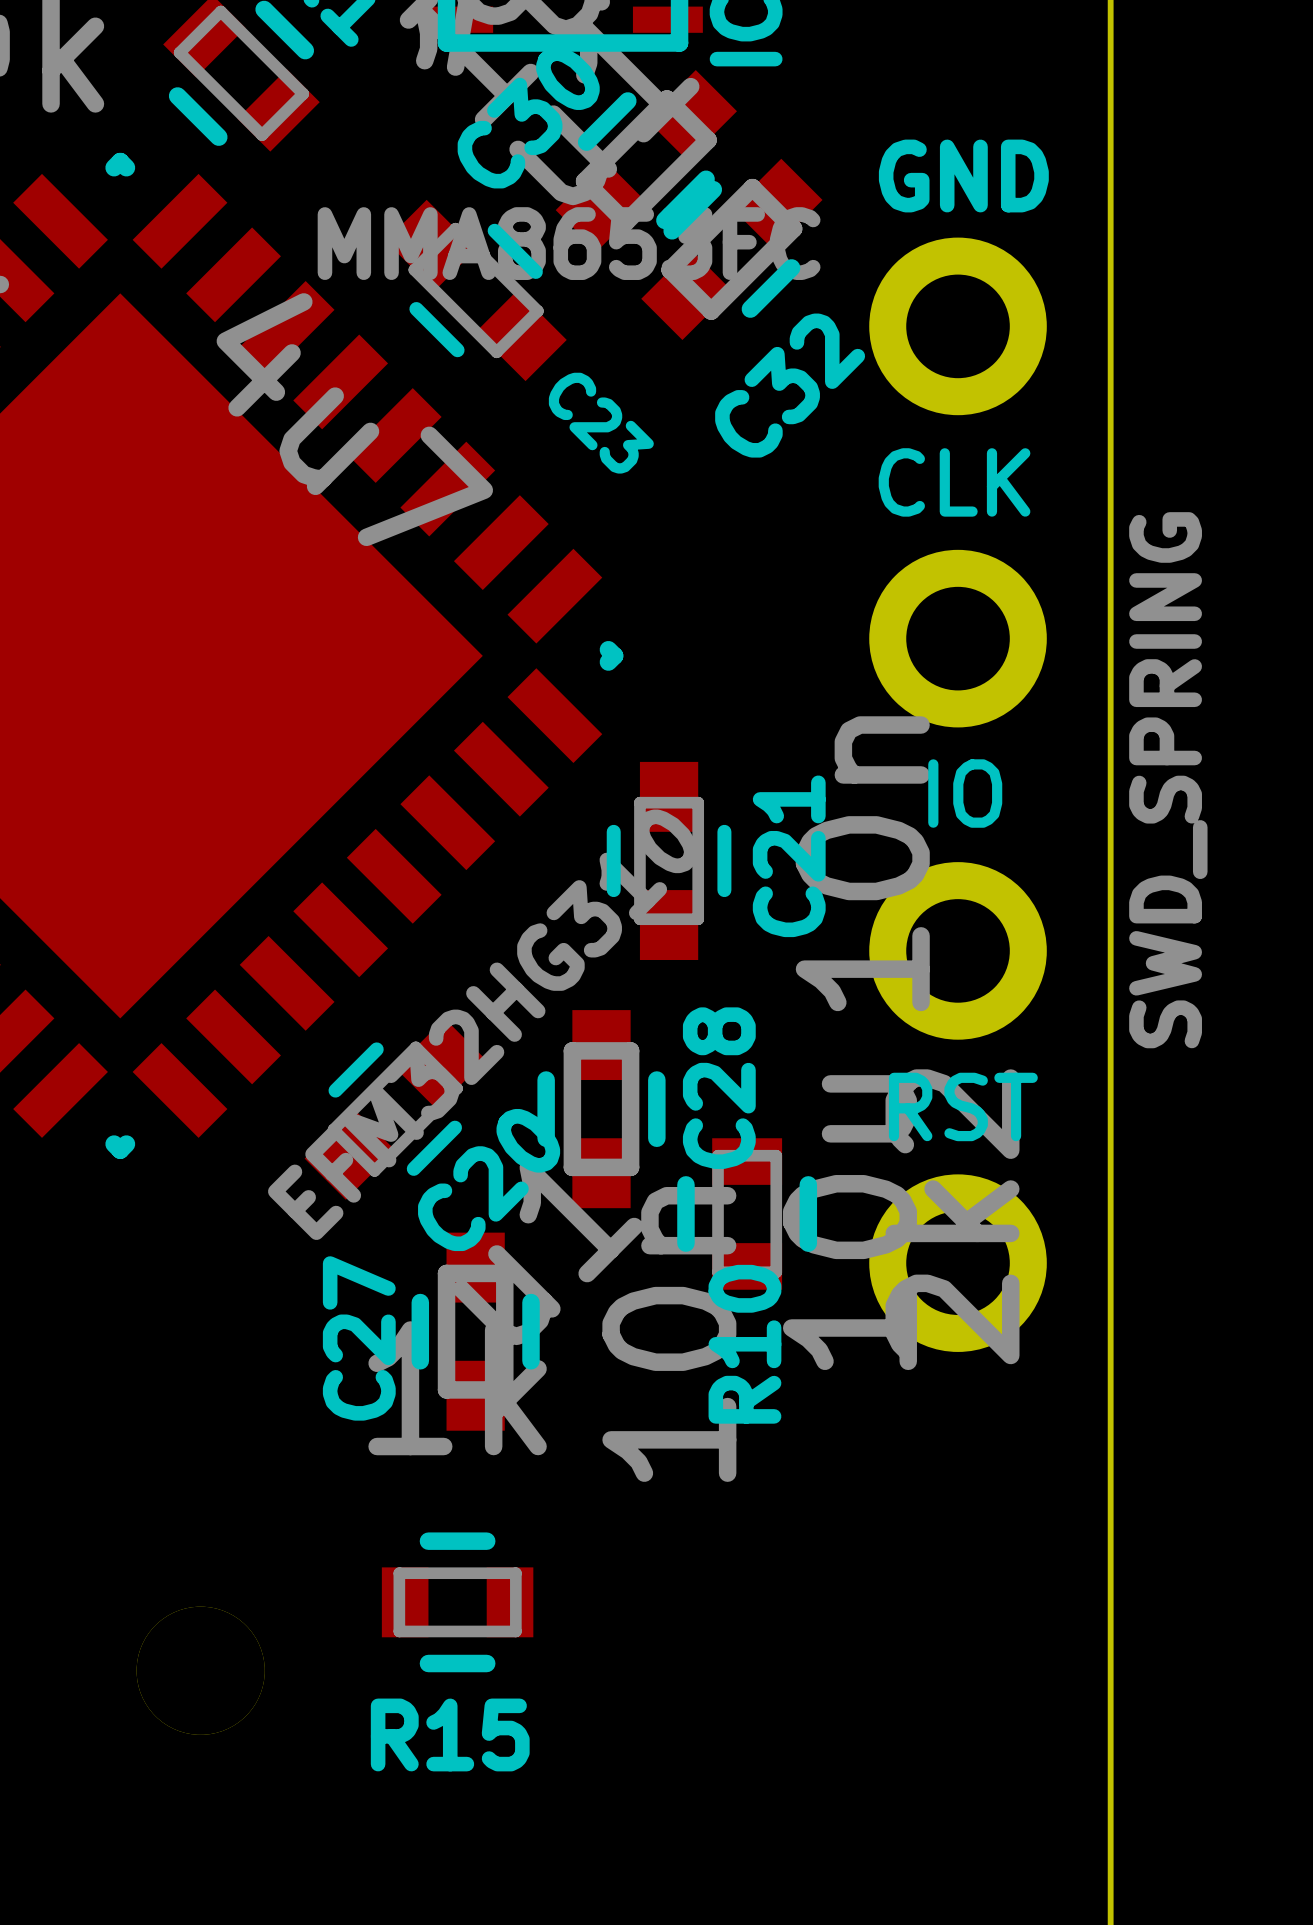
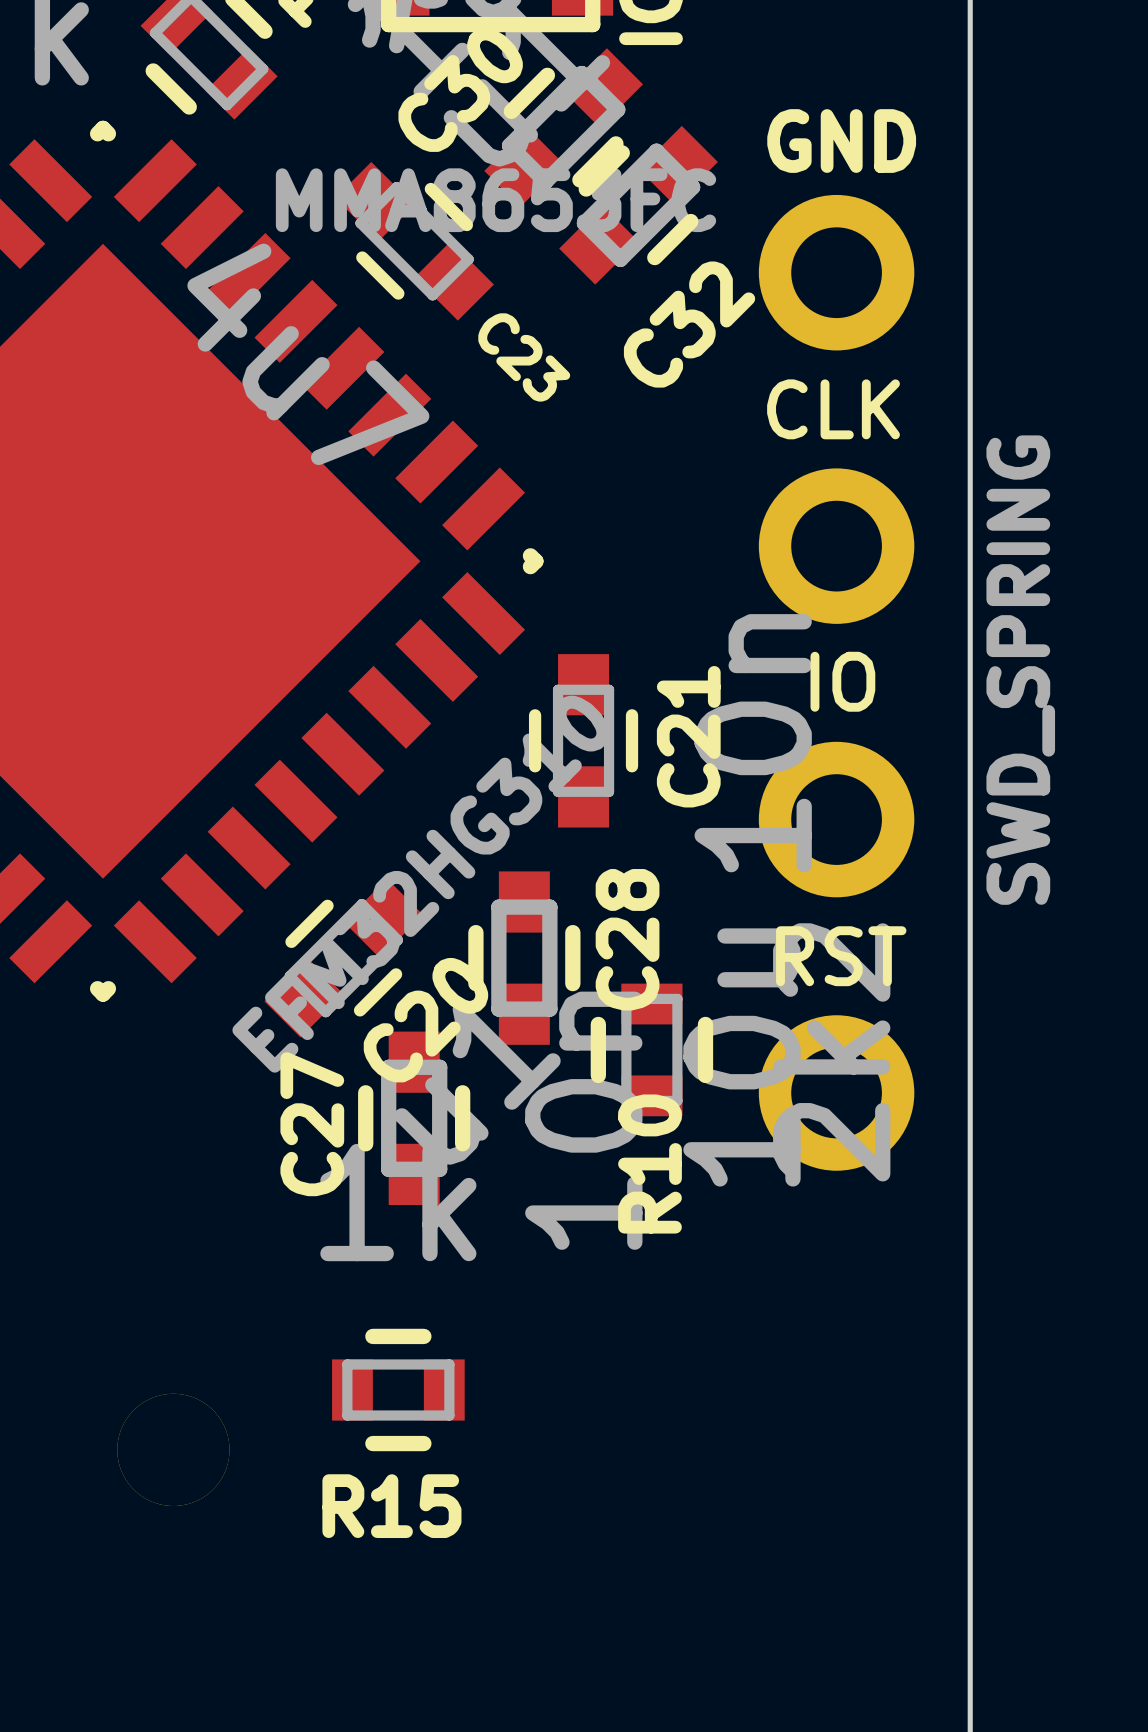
C27 position: (475, 1331) -> (414, 1118)

